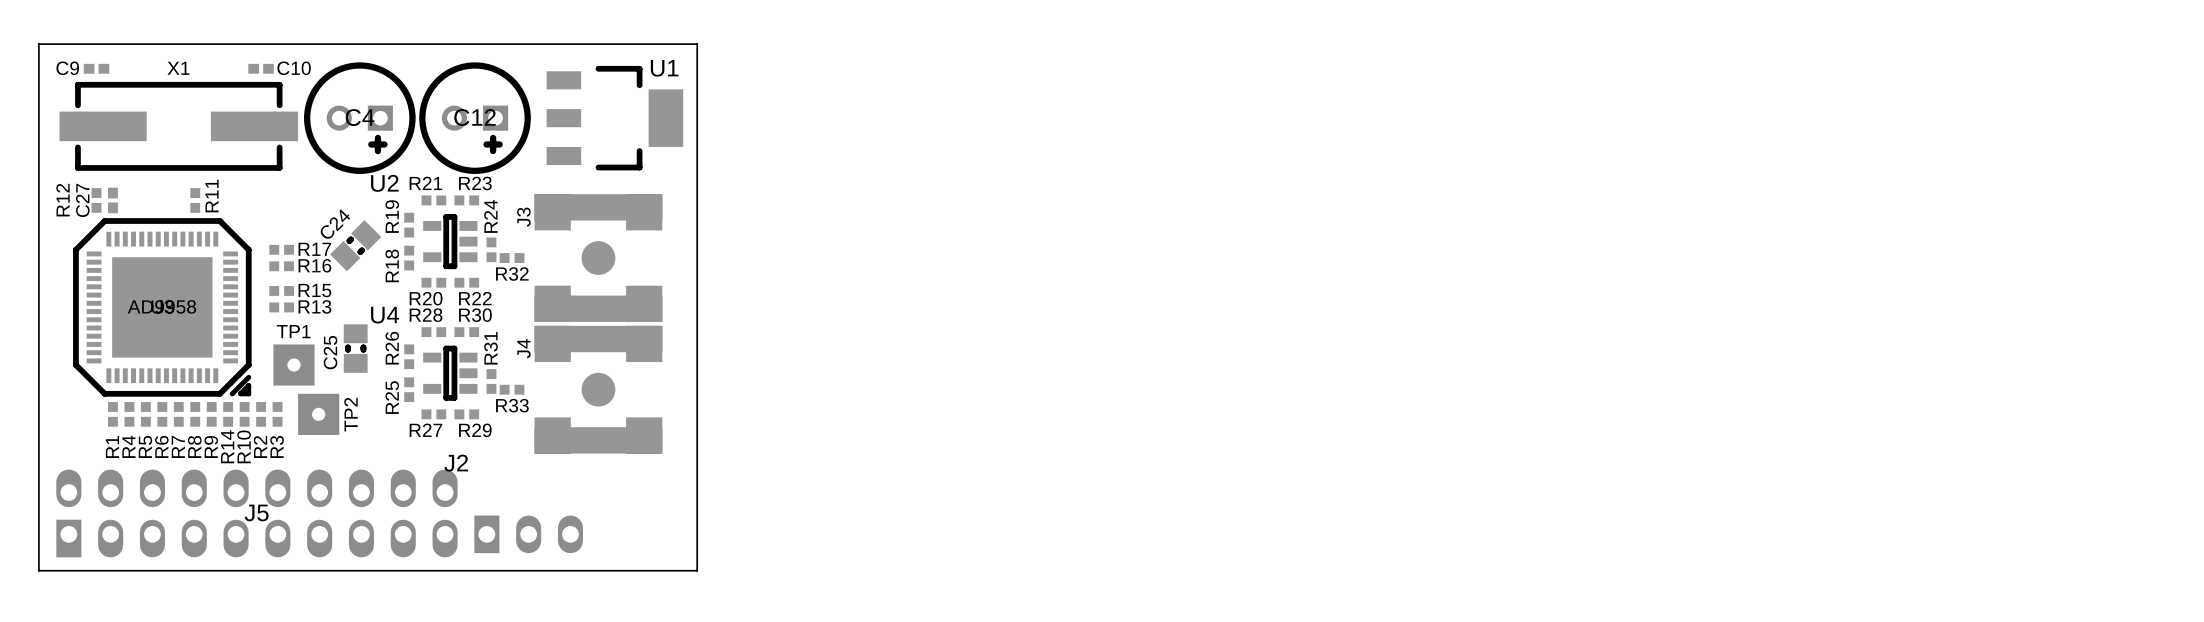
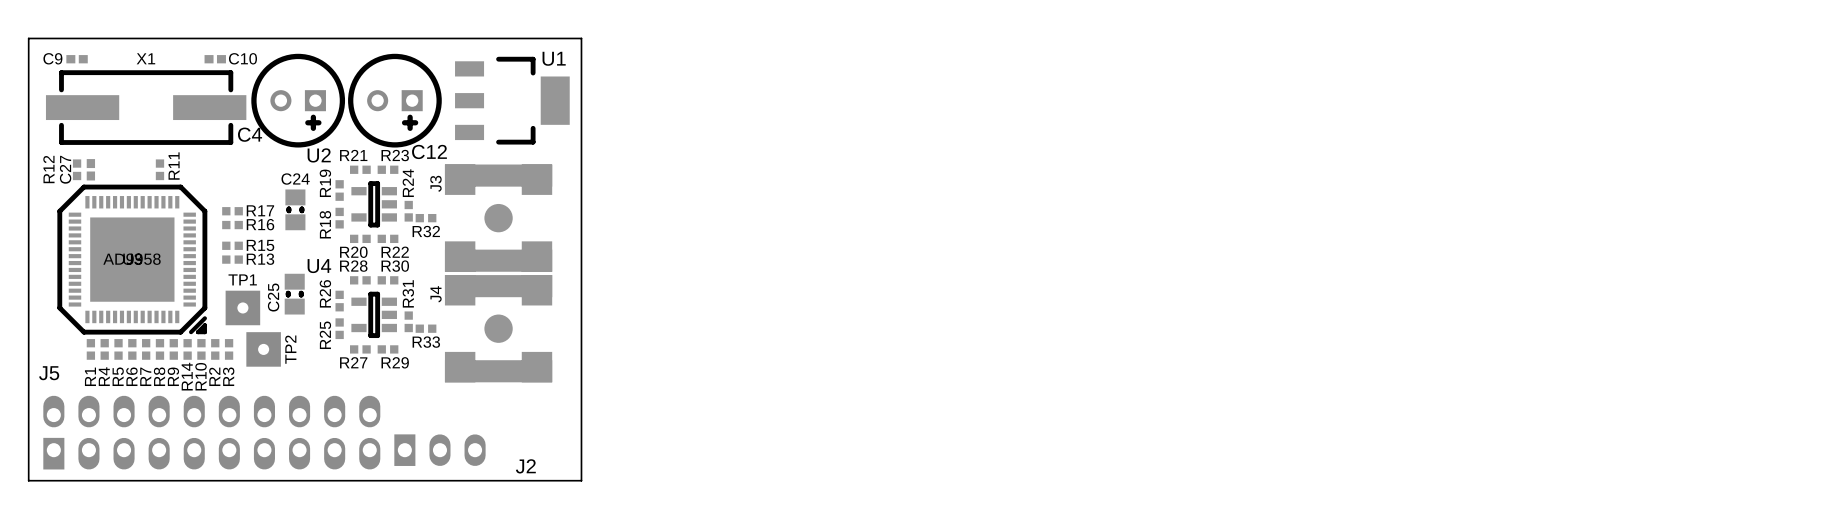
C4 name position: C4 (360, 117) -> C4 (250, 134)
C12 name position: C12 (475, 117) -> C12 (429, 151)
C24 rotation: 0° (355, 245) -> 45° counterclockwise (295, 209)
J2 name position: J2 (456, 463) -> J2 (525, 466)
J5 name position: J5 (256, 512) -> J5 (49, 373)

